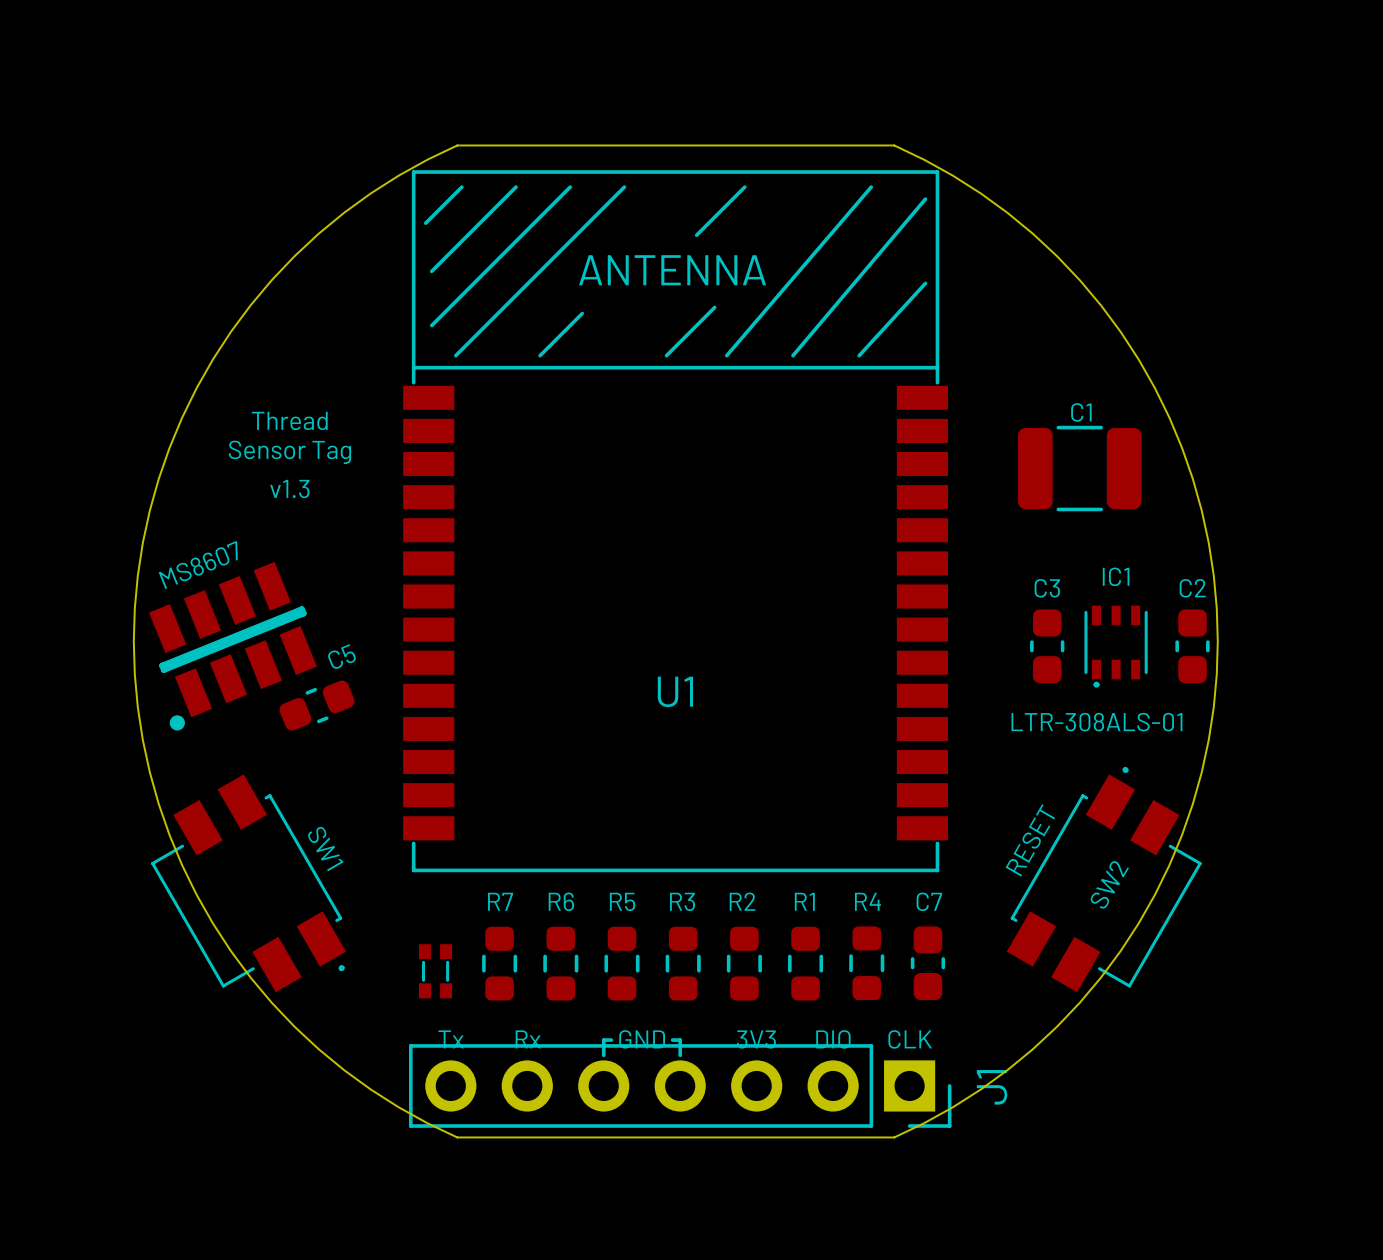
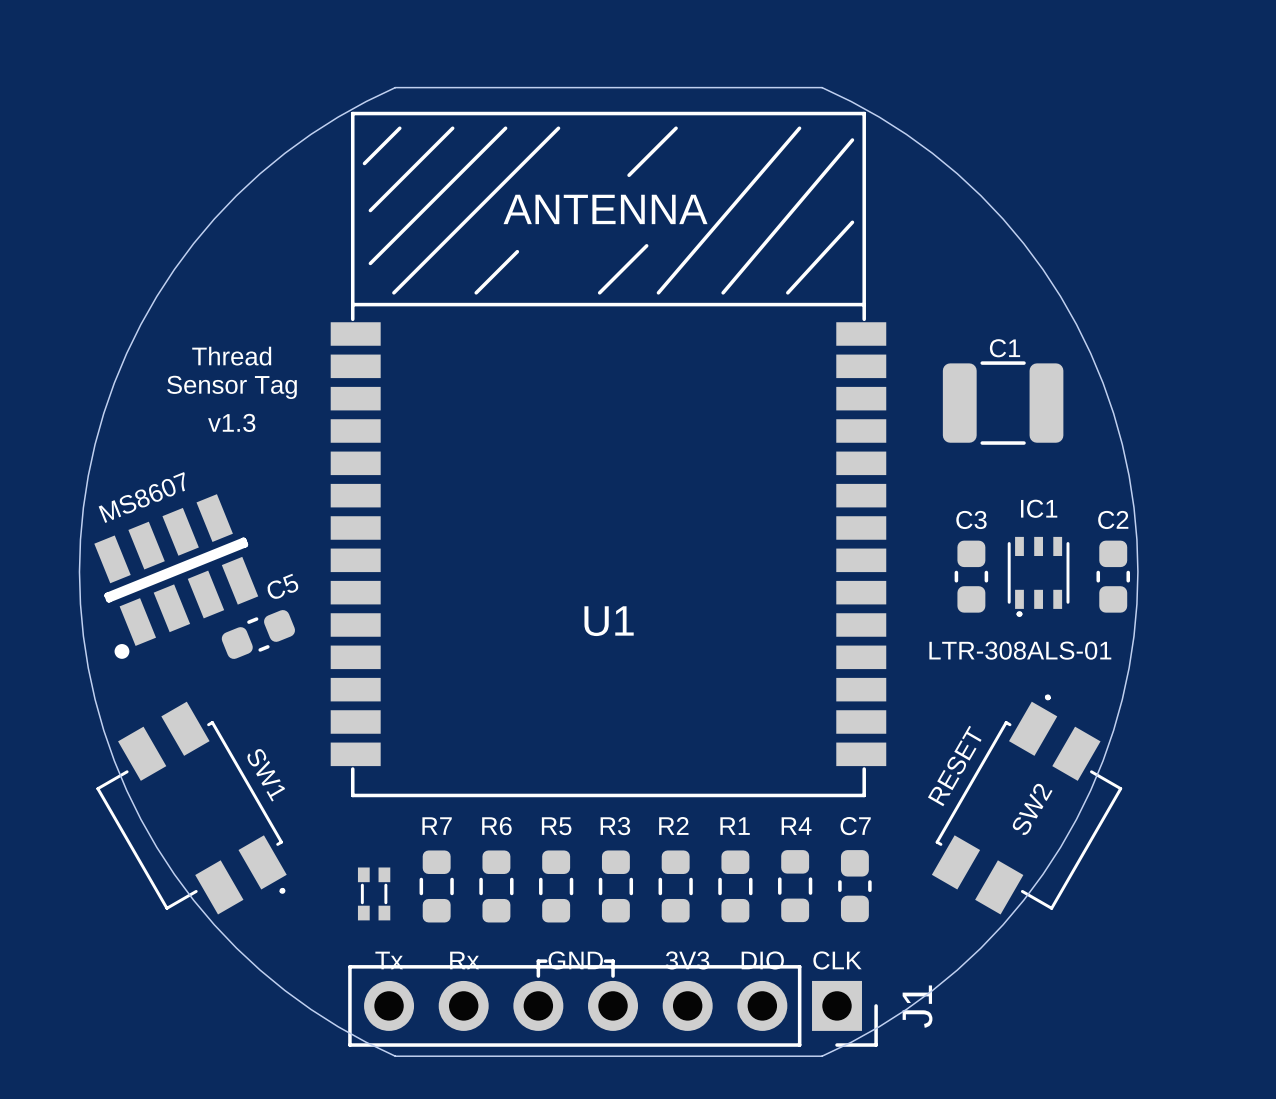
U1 footprint: [403, 170, 949, 873] -> [330, 111, 887, 798]

